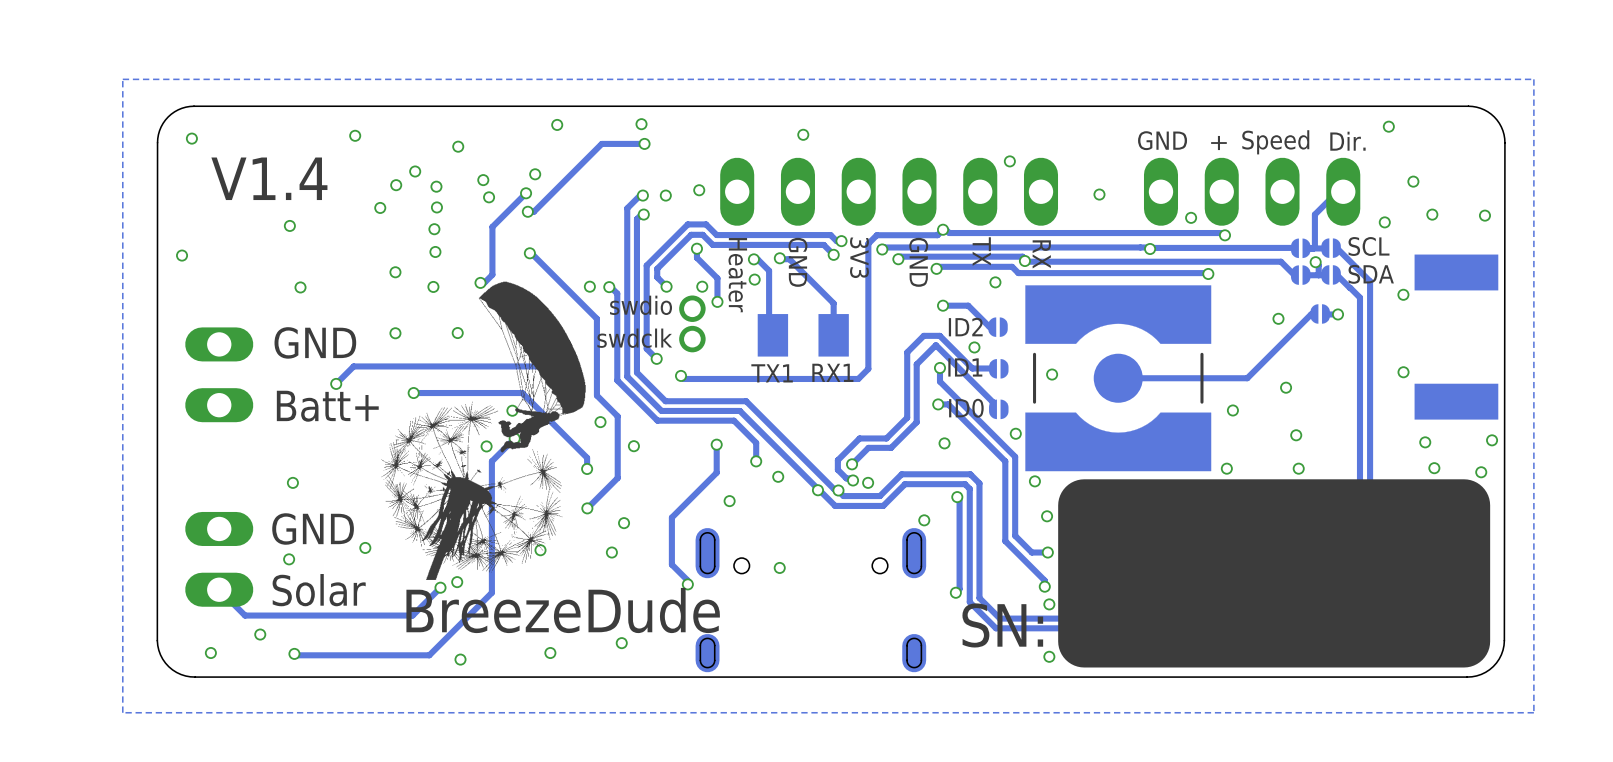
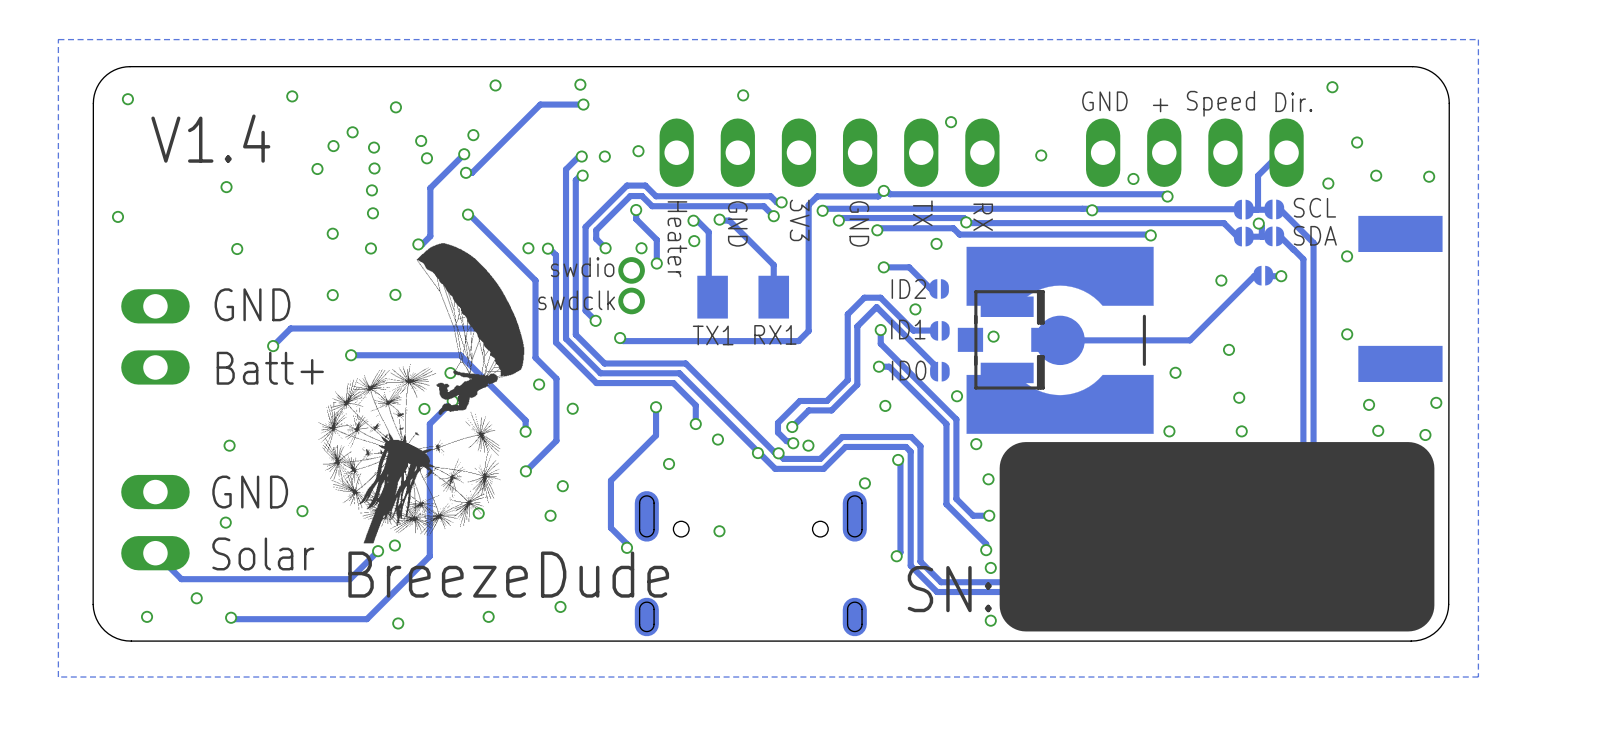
part: none -> (1007, 339)

